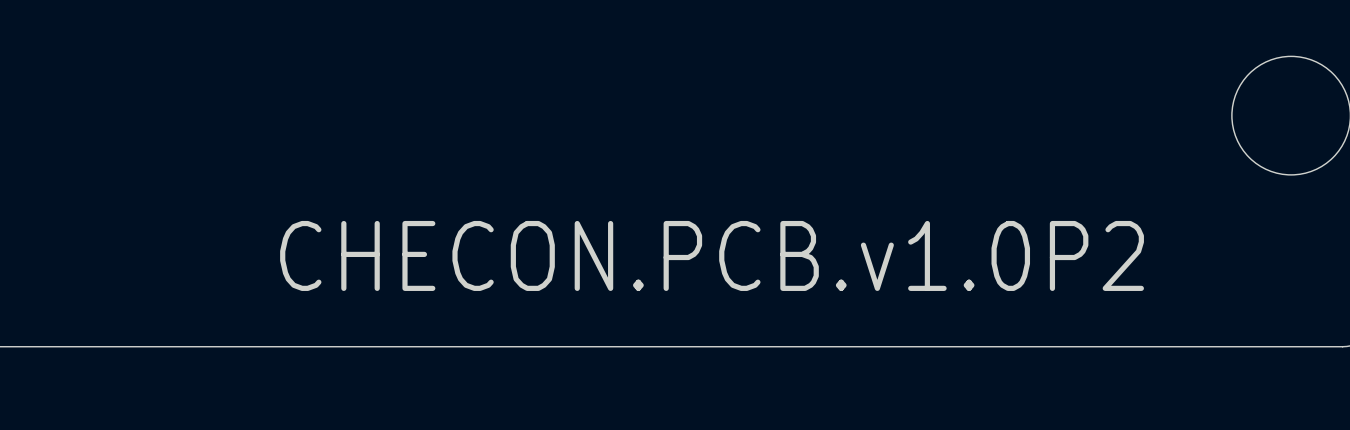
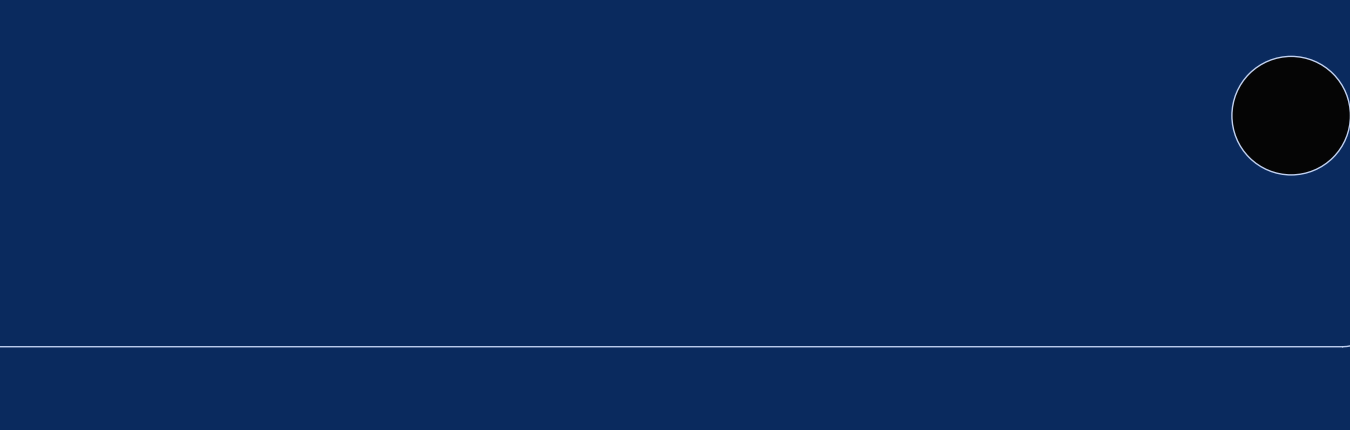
text: CHECON.PCB.v1.0P2 (712, 255) -> none

